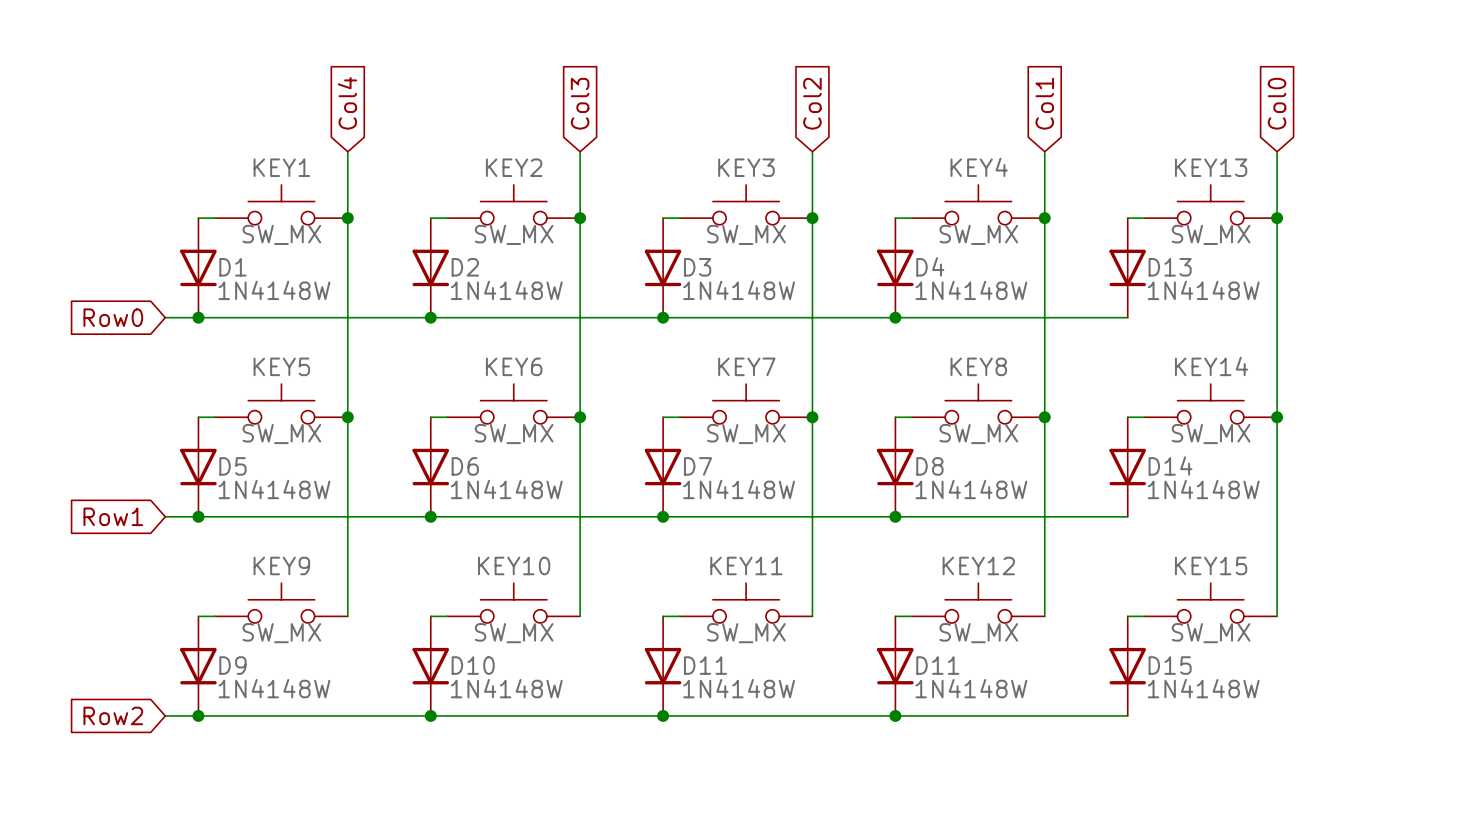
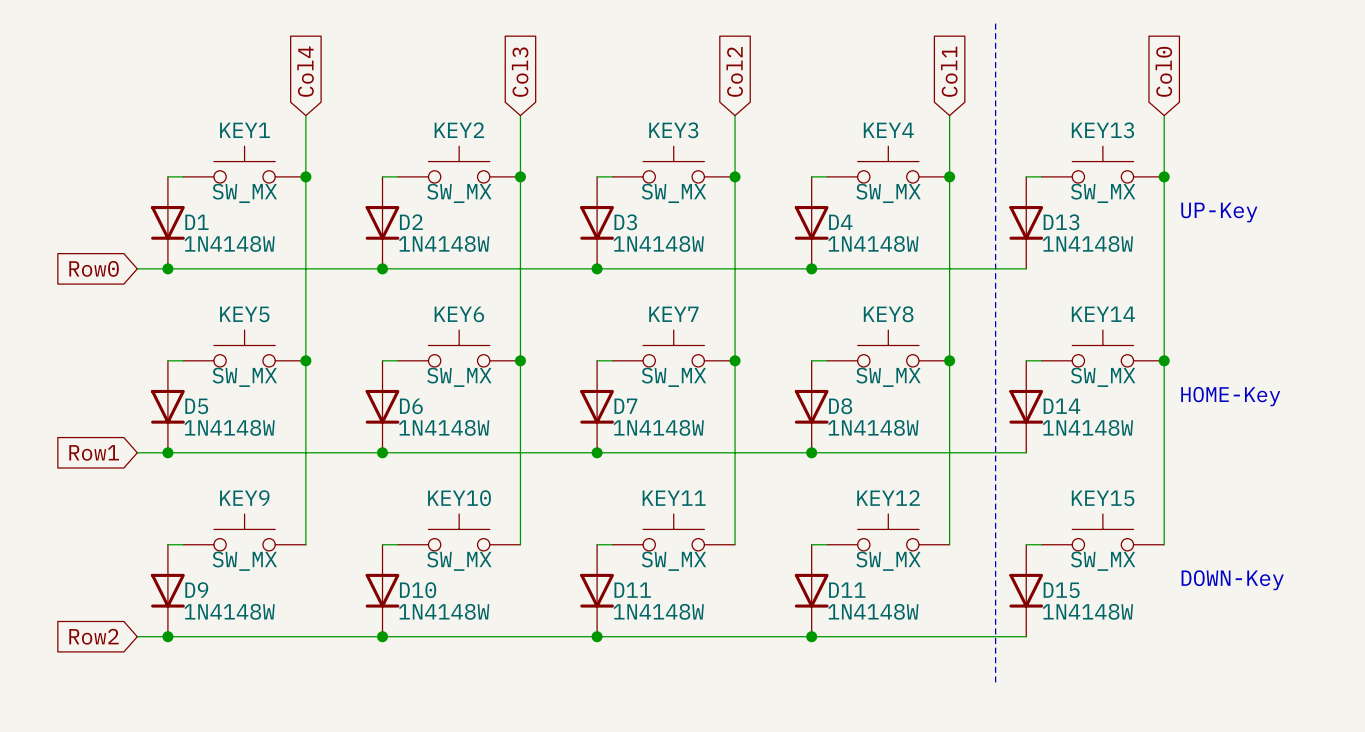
line: none -> (995, 23) (995, 682)
text: none -> UP-Key (1219, 212)
text: none -> HOME-Key (1230, 396)
text: none -> DOWN-Key (1232, 580)

